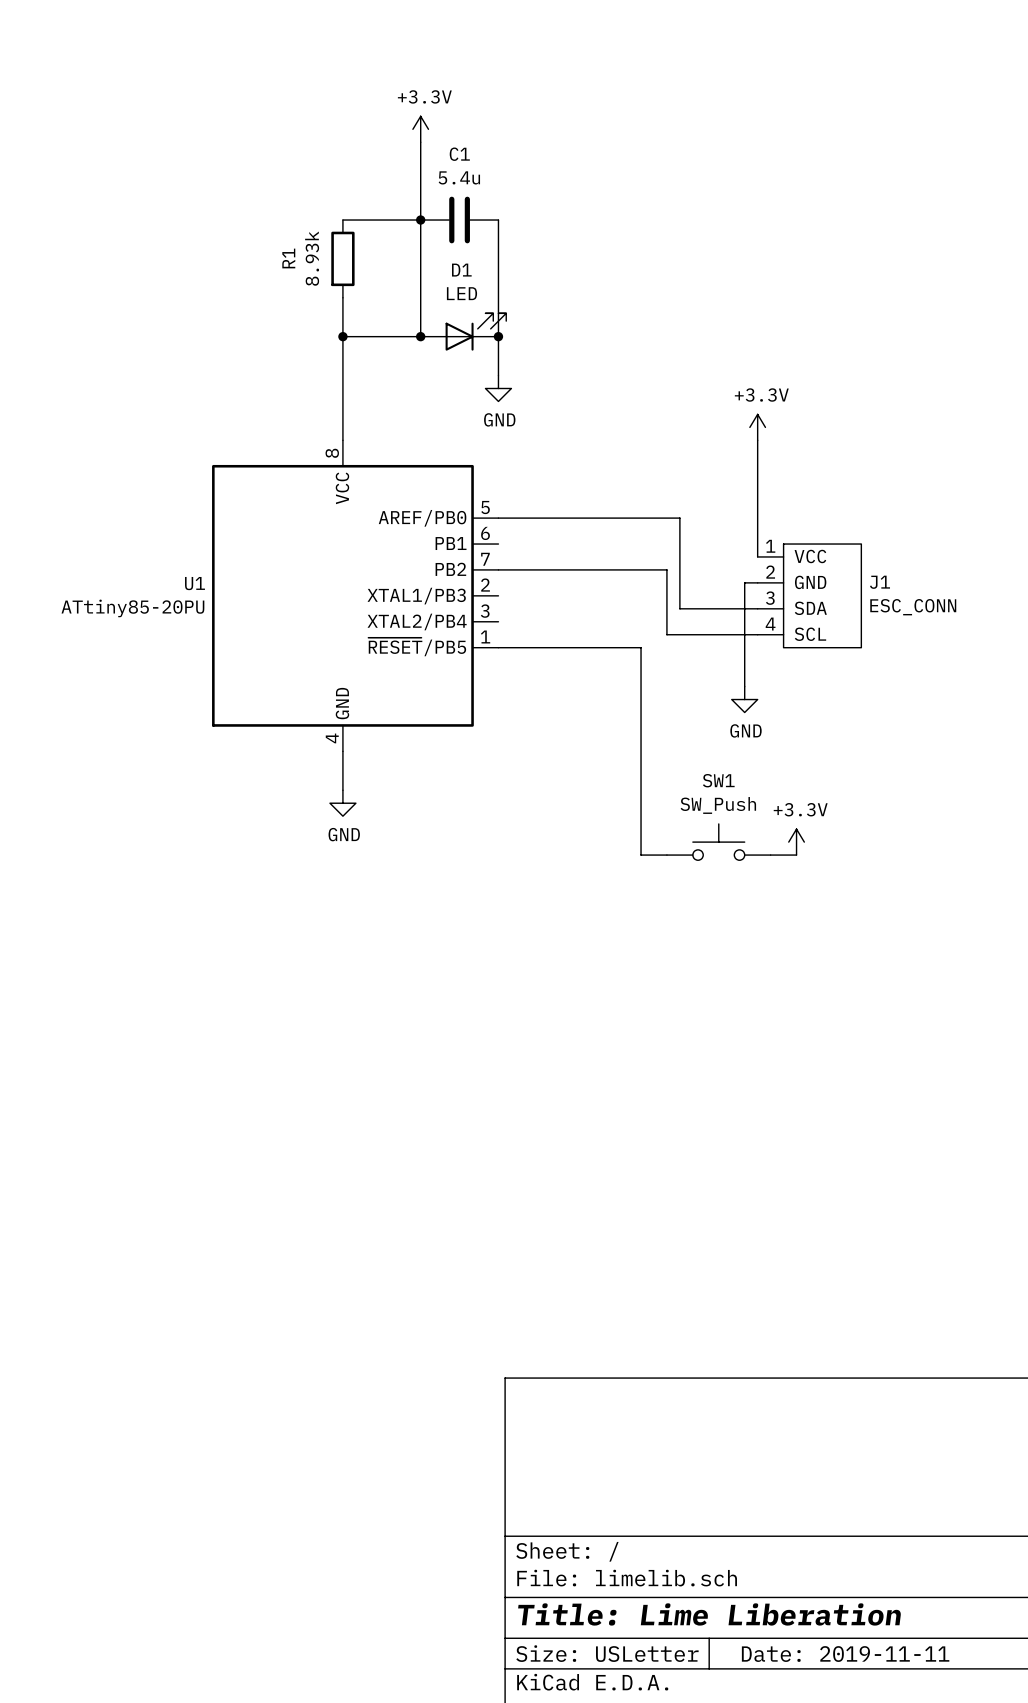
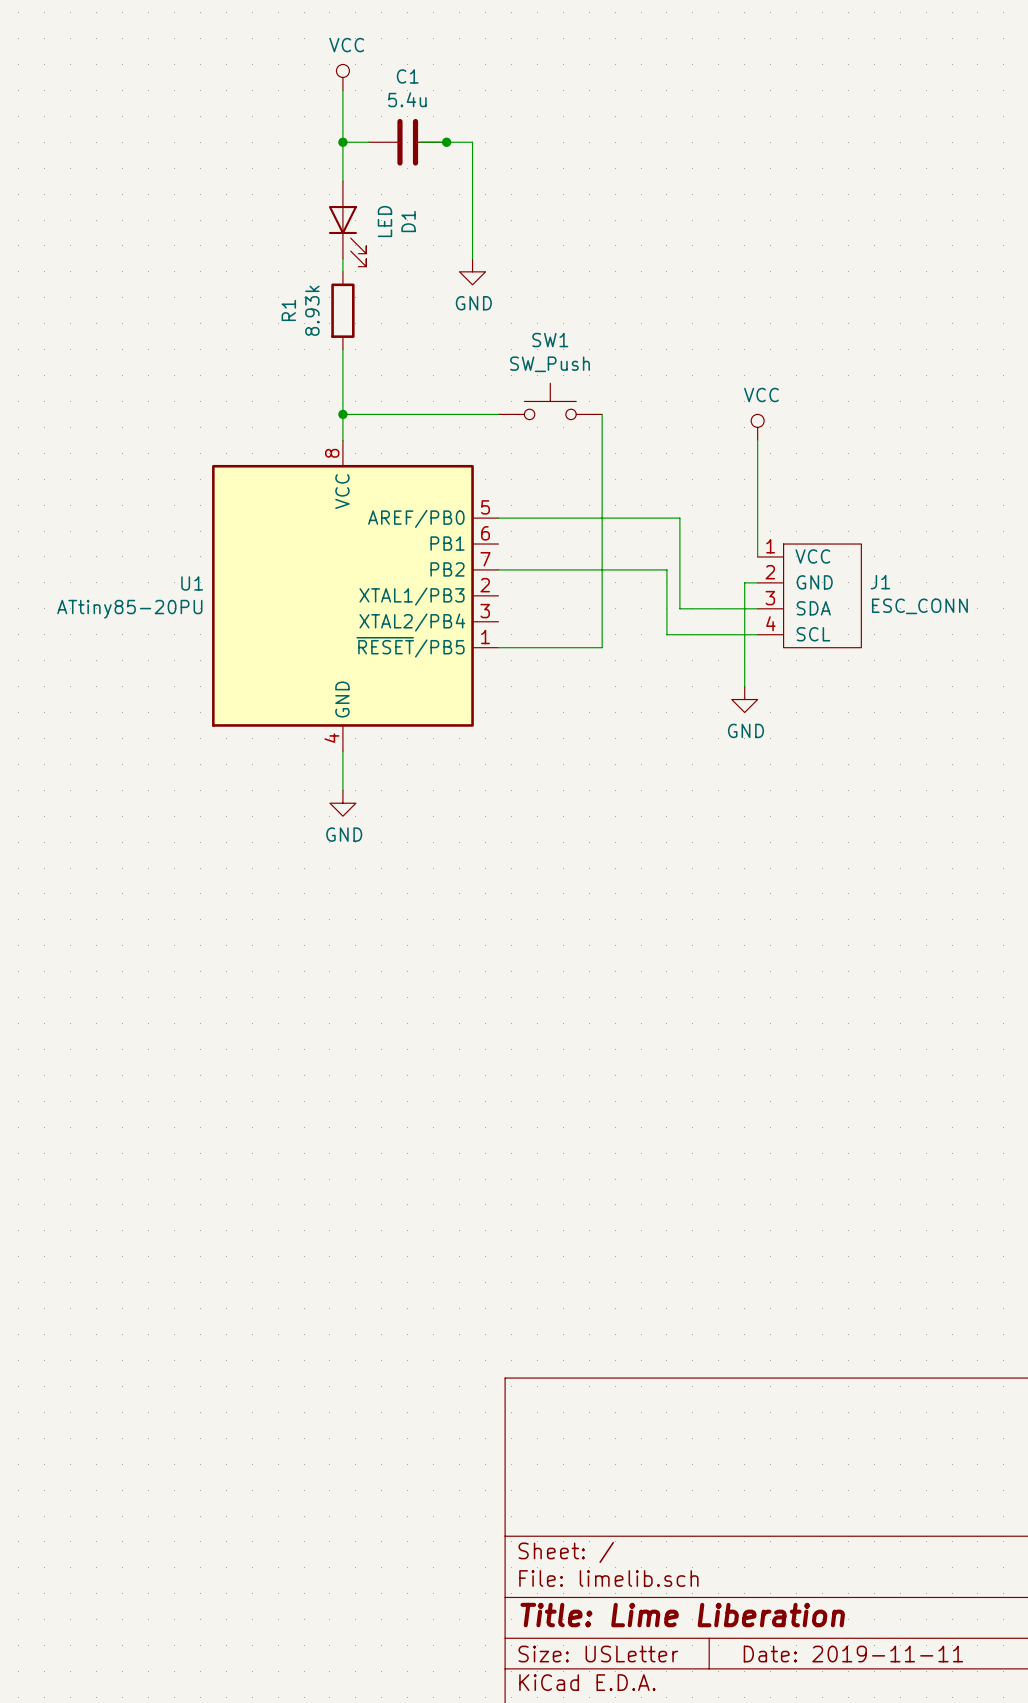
power symbol: none -> VCC (342, 77)
wire: none -> (342, 90) (342, 181)
power symbol: +3.3V (420, 129) -> none
wire: none -> (342, 142) (368, 142)
junction: none -> (342, 142)
wire: (420, 142) (420, 336) (342, 336) -> (420, 142) (472, 142) (472, 258)
junction: none -> (446, 142)
wire: (342, 220) (420, 220) -> none
junction: (420, 220) -> none
C1 position: (459, 220) -> (407, 142)
wire: (498, 220) (498, 375) -> none
wire: none -> (342, 258) (342, 271)
R1 position: (342, 258) -> (342, 310)
wire: (342, 297) (342, 349) -> none
D1 position: (463, 331) -> (347, 223)
D1 rotation: 0° (475, 331) -> 90° clockwise (347, 236)
junction: (342, 336) -> none
junction: (420, 336) -> none
junction: (498, 336) -> none
power symbol position: GND (498, 388) -> GND (472, 271)
wire: none -> (342, 414) (498, 414)
junction: none -> (342, 414)
power symbol: +3.3V (757, 427) -> VCC (757, 427)
wire: (602, 647) (641, 647) (641, 855) (666, 855) -> (602, 647) (602, 414)
SW1 position: (718, 842) -> (550, 401)
power symbol: +3.3V (796, 842) -> none
wire: (770, 855) (796, 855) -> none

